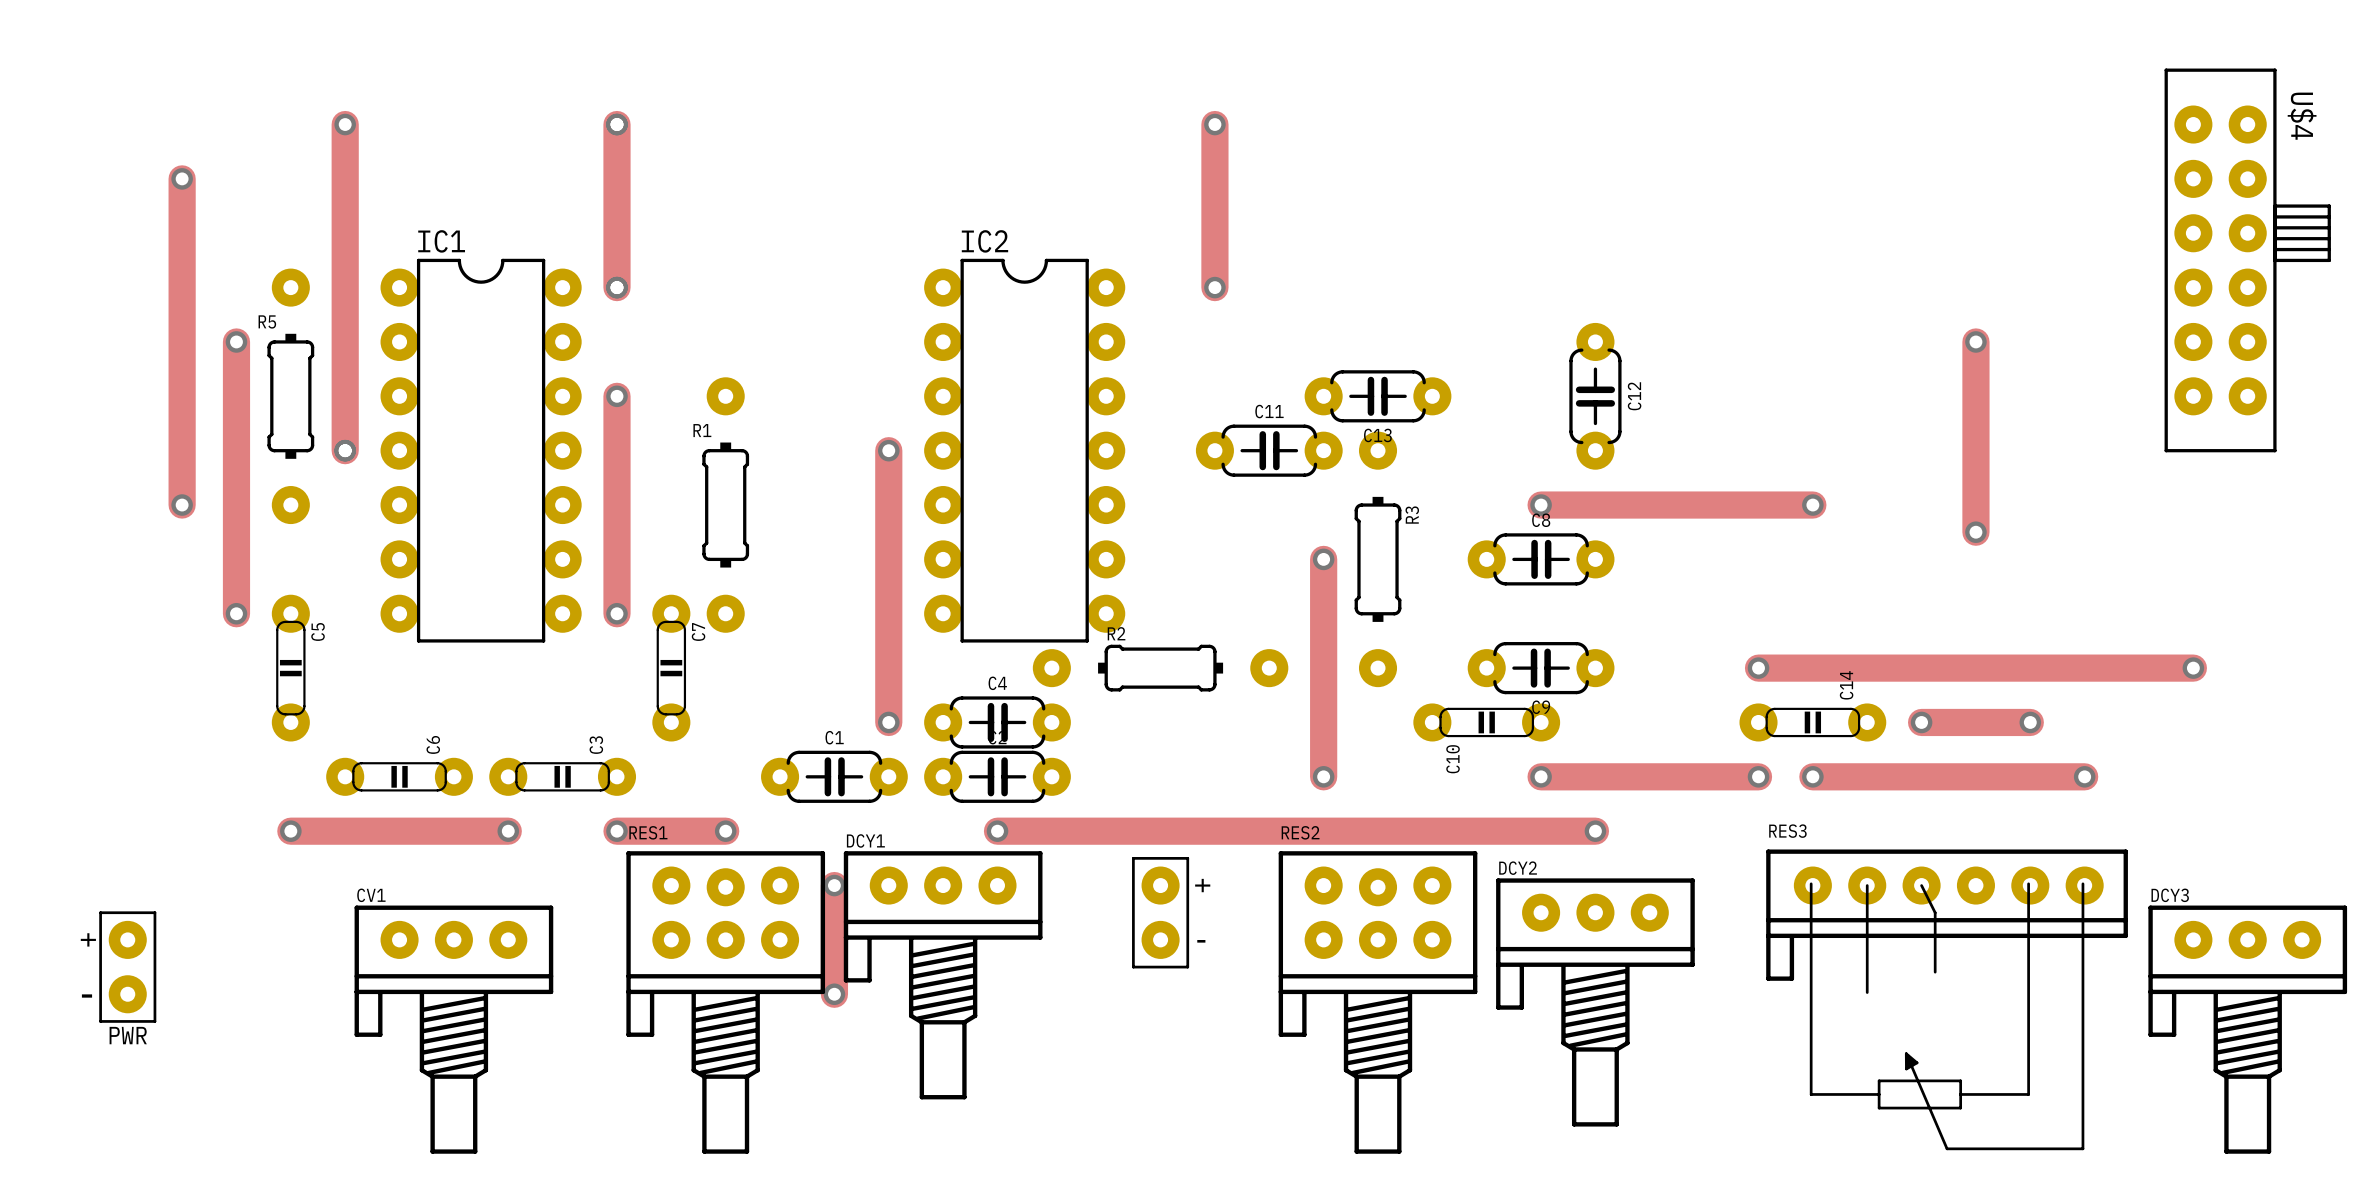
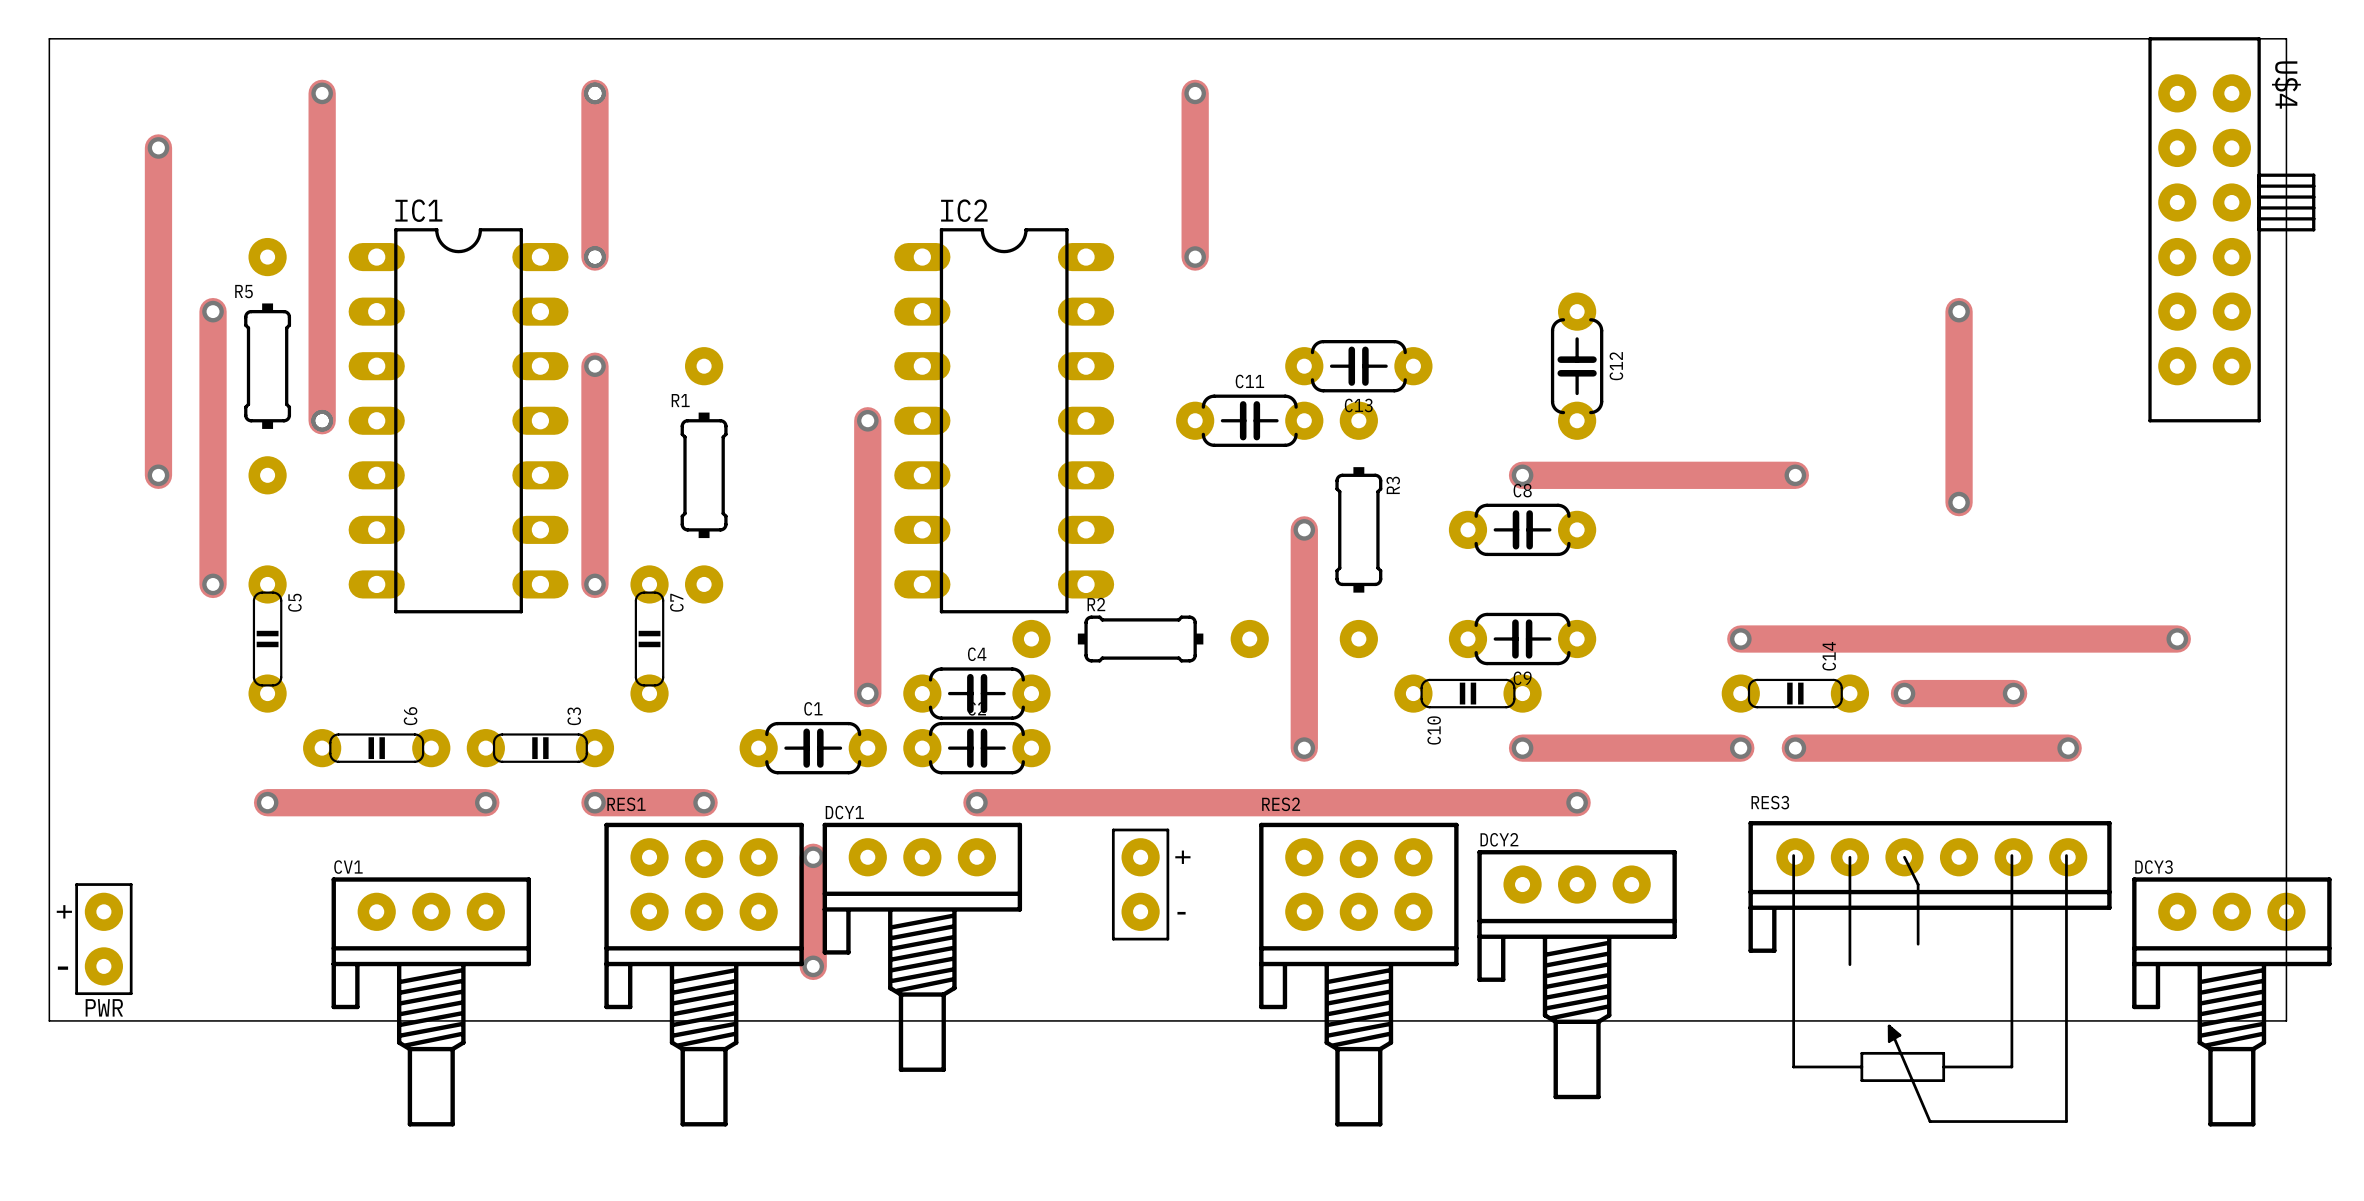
board edge: none -> (49, 38) (2286, 38) (2286, 1020) (49, 1020) (49, 38)
IC1 footprint: [380, 258, 582, 643] -> [348, 228, 569, 614]
IC2 footprint: [924, 258, 1126, 643] -> [894, 228, 1115, 614]

